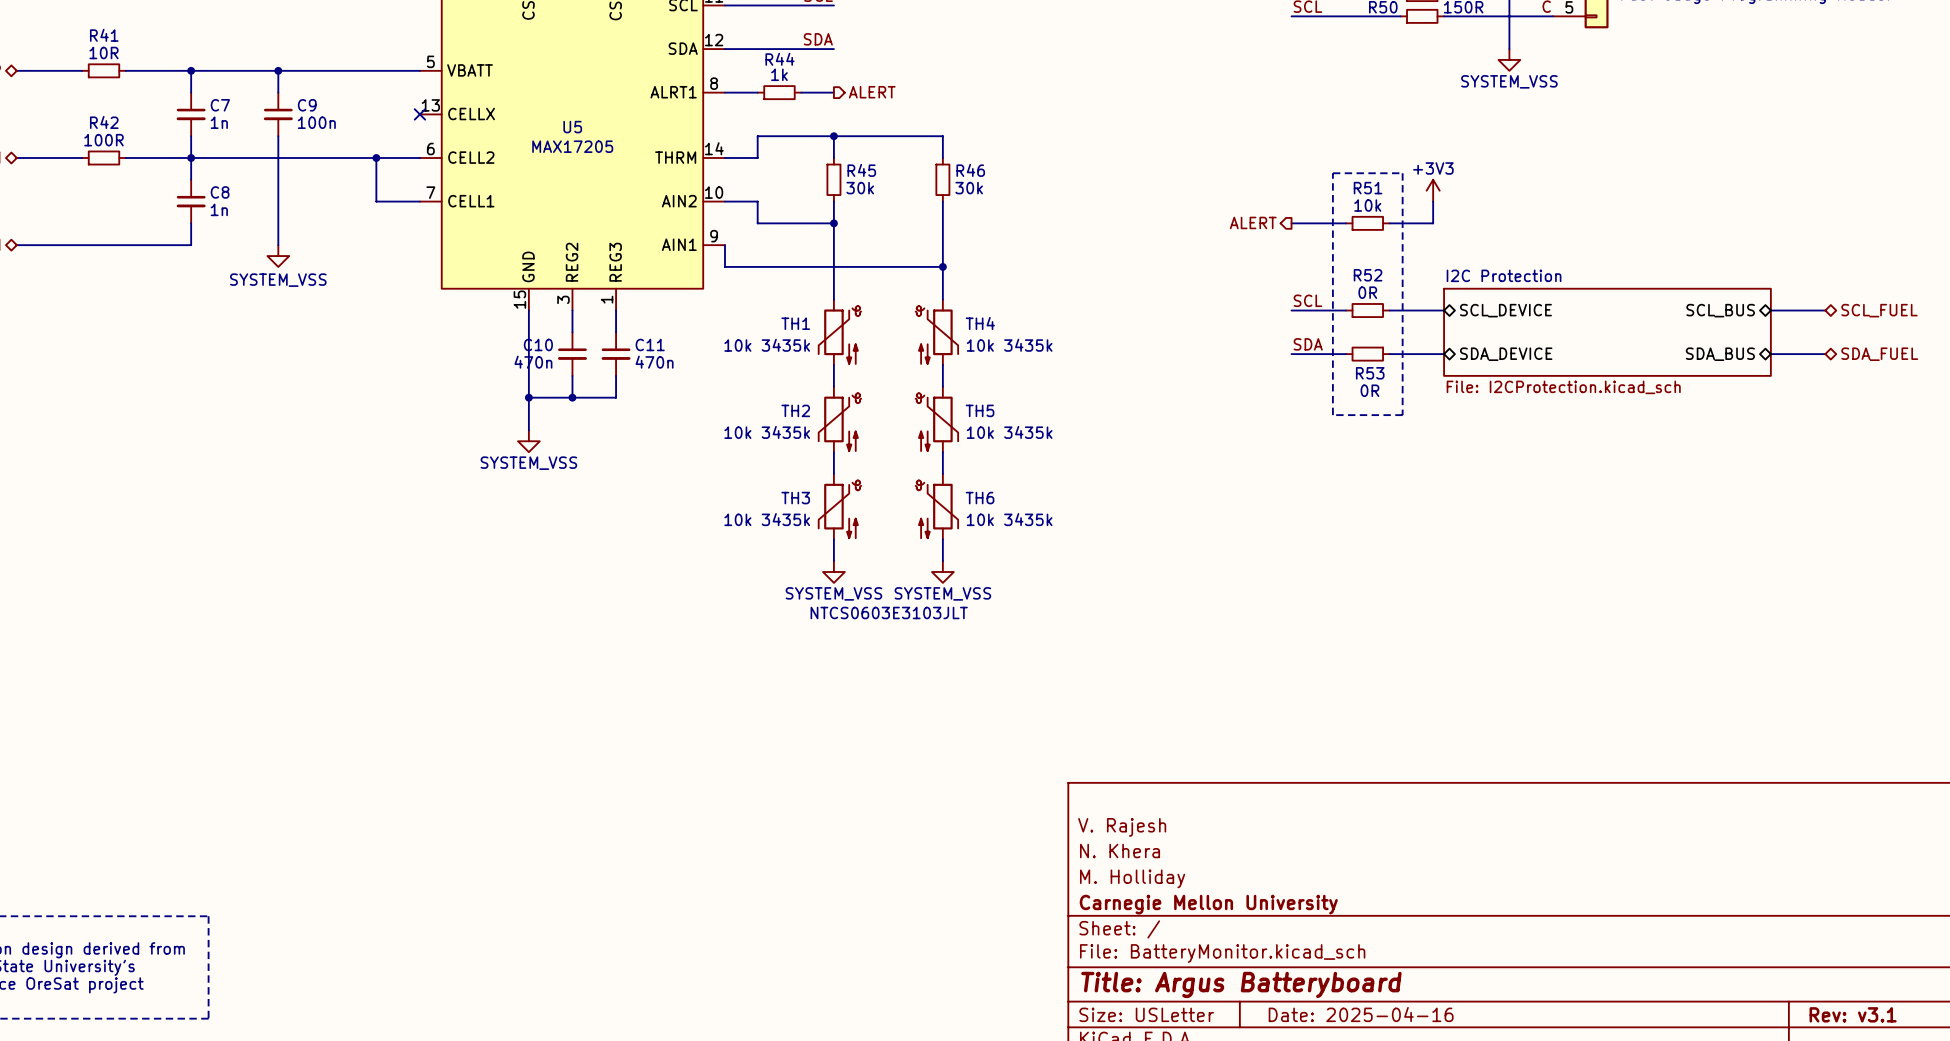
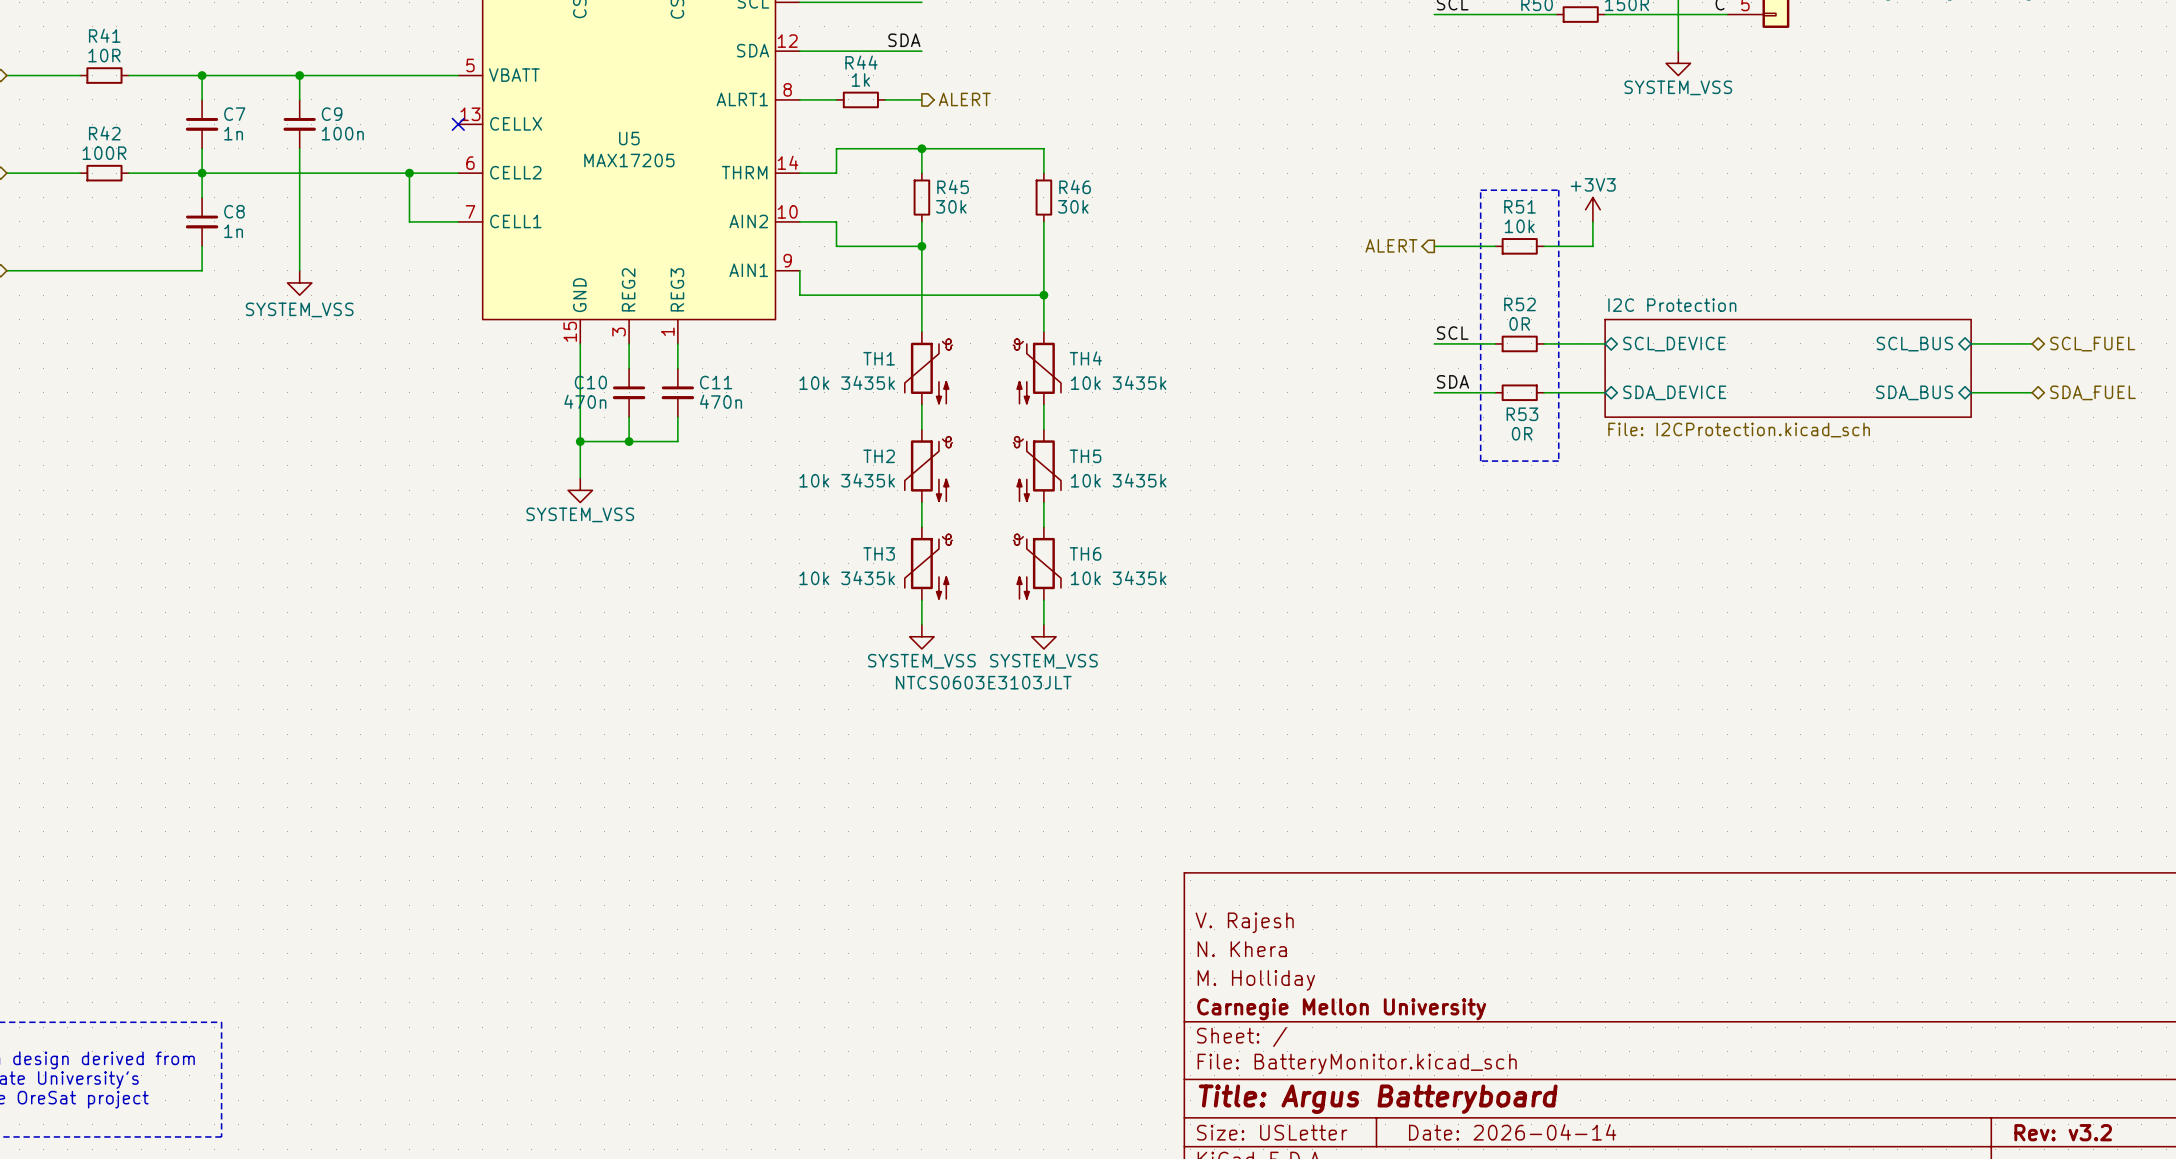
title block: Date: 2025-04-16 (1361, 1014) -> Date: 2026-04-14 (1512, 1132)
title block: Rev: v3.1 (1853, 1014) -> Rev: v3.2 (2063, 1132)

